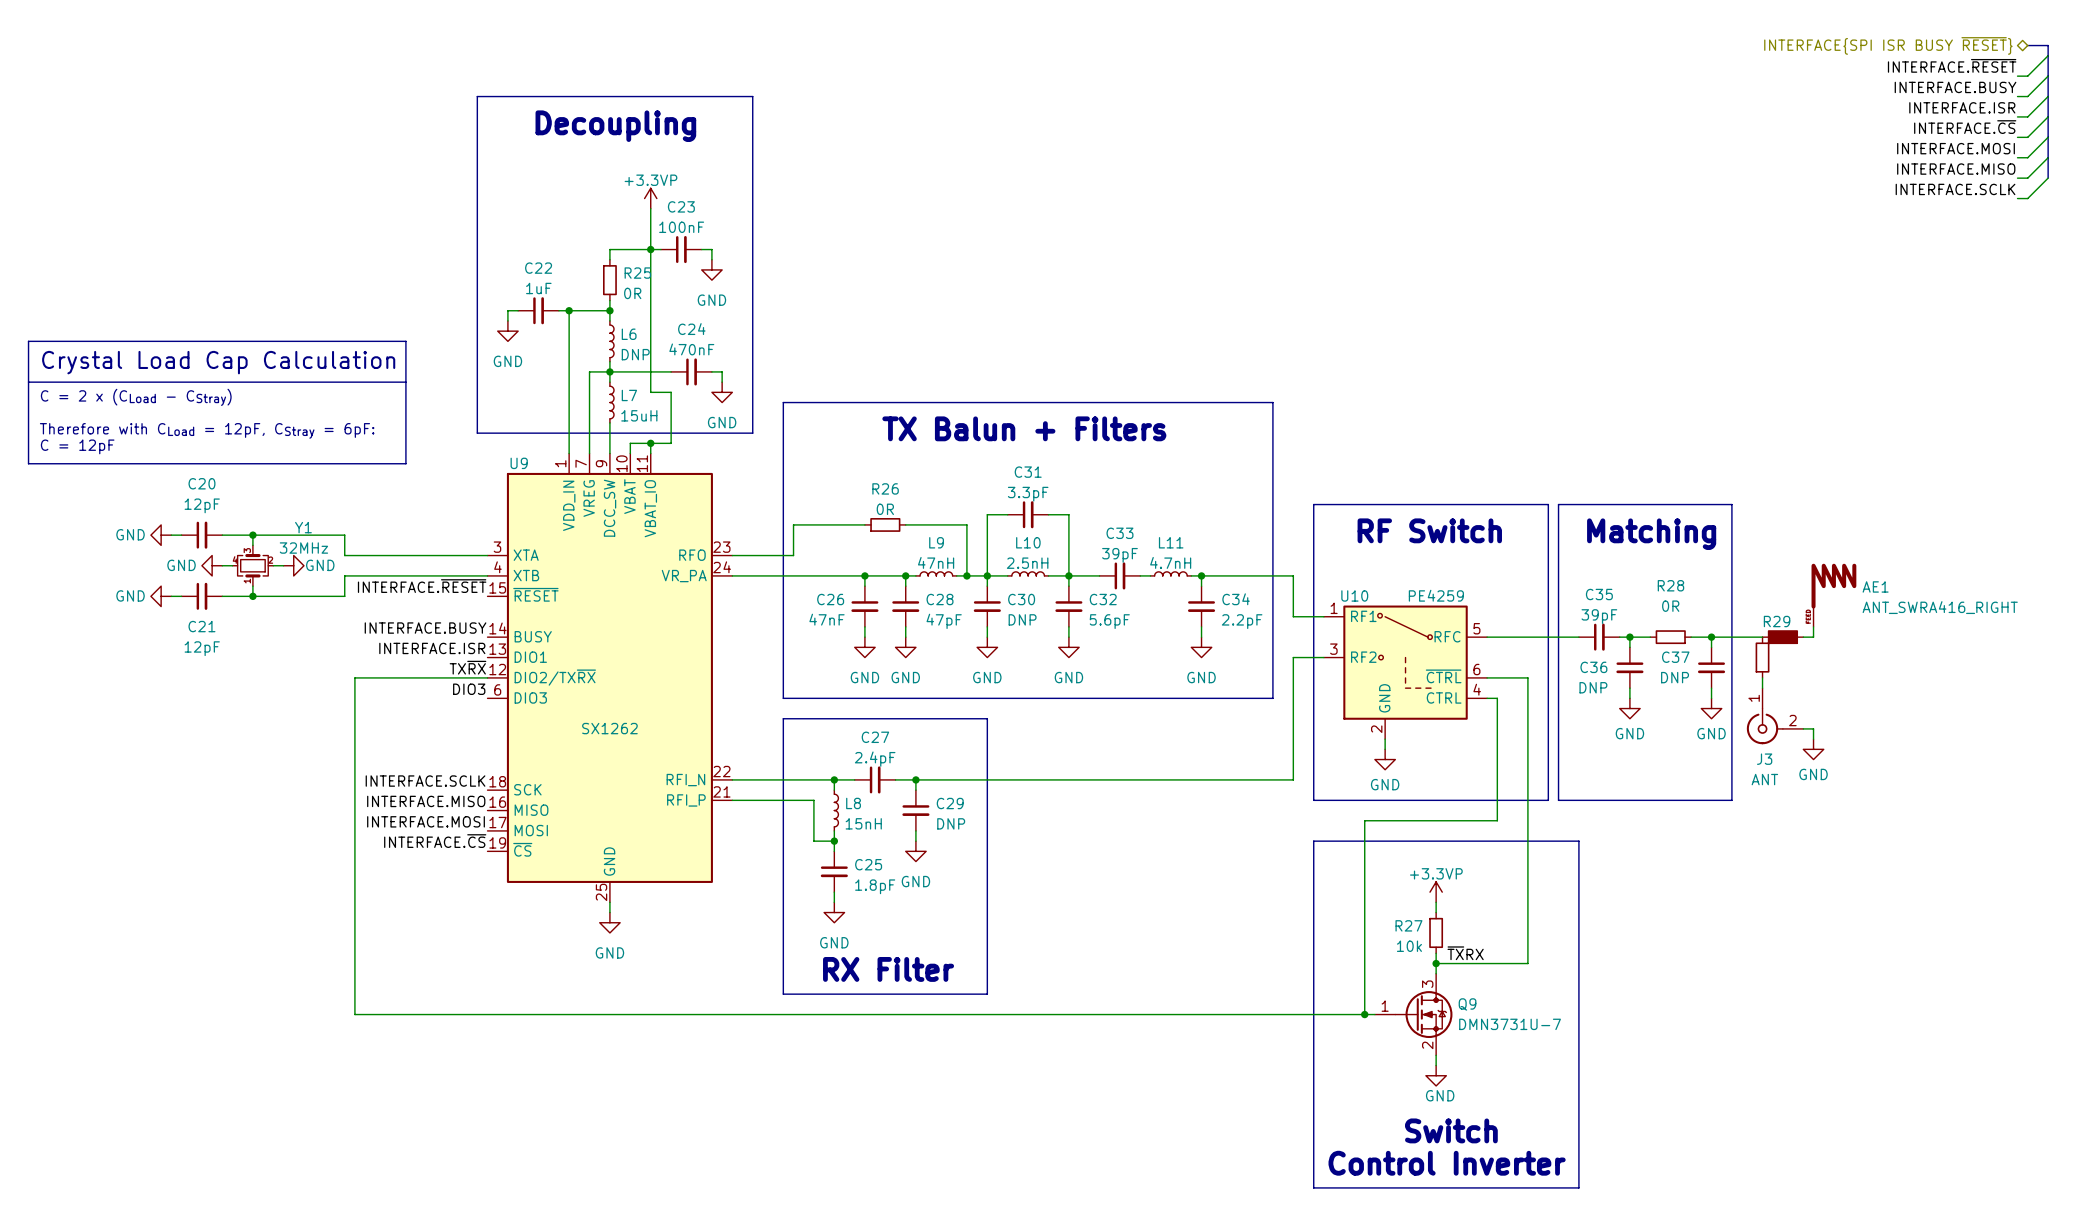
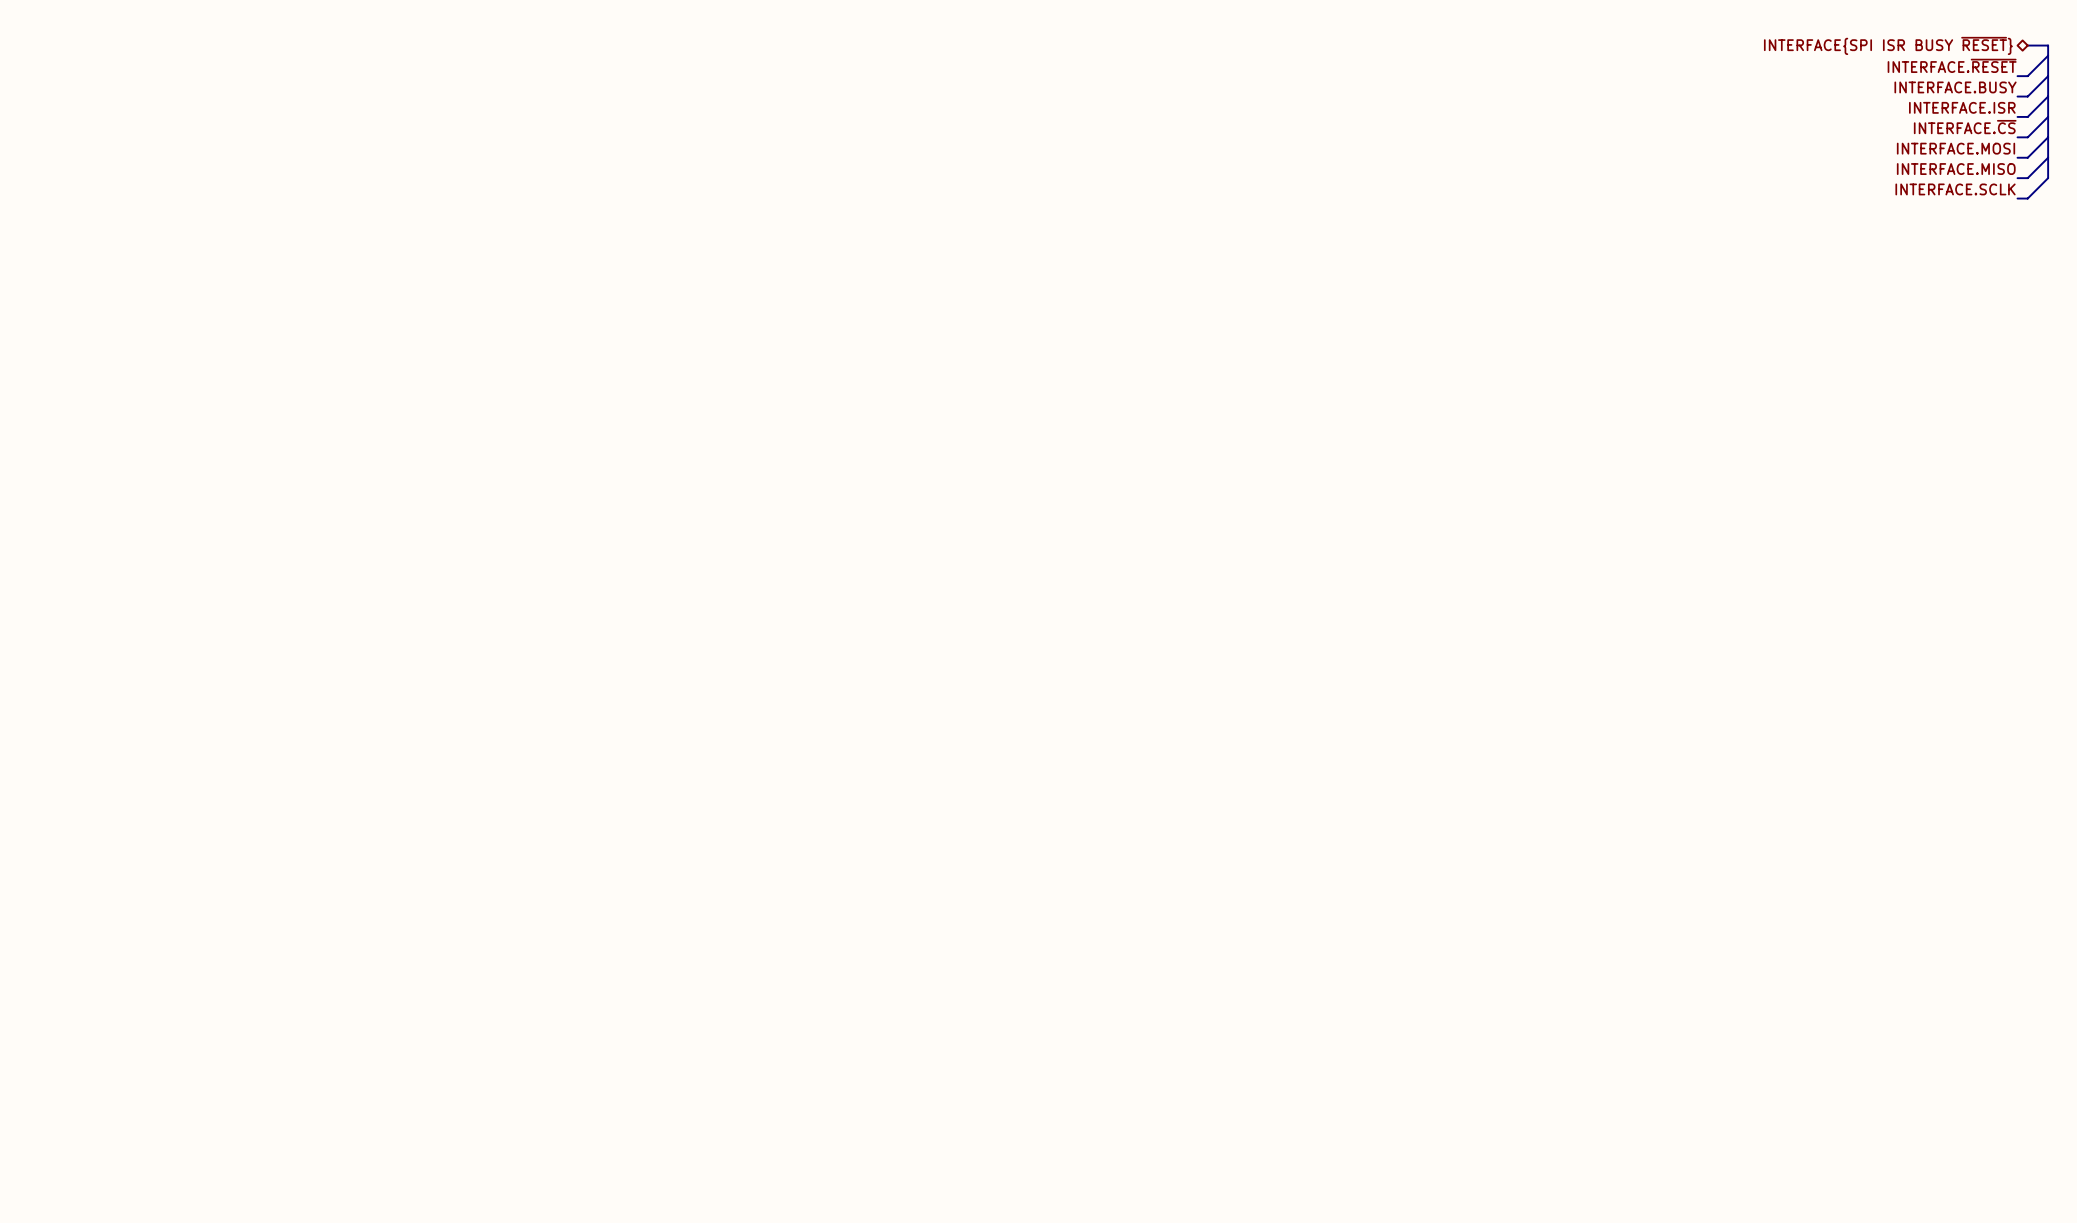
line: (477, 96) (477, 433) (752, 433) (752, 96) (477, 96) -> none
text: Decoupling (615, 126) -> none
power symbol: +3.3VP (650, 198) -> none
wire: (650, 208) (650, 392) (671, 392) (671, 443) (630, 443) (630, 453) -> none
junction: (650, 249) -> none
wire: (660, 249) (609, 249) (609, 259) -> none
C23: 100nF (681, 249) -> none
wire: (701, 249) (711, 249) (711, 259) -> none
power symbol: GND (711, 269) -> none
R25: 0R (609, 280) -> none
wire: (609, 300) (609, 320) -> none
wire: (518, 310) (507, 310) (507, 320) -> none
C22: 1uF (538, 310) -> none
wire: (558, 310) (609, 310) -> none
wire: (569, 310) (569, 453) -> none
junction: (569, 310) -> none
junction: (609, 310) -> none
power symbol: GND (507, 331) -> none
line: (28, 341) (28, 463) (405, 463) (405, 341) (28, 341) -> none
L6: DNP (611, 341) -> none
wire: (609, 361) (609, 382) -> none
text: Crystal Load Cap Calculation (218, 362) -> none
junction: (609, 371) -> none
wire: (671, 371) (589, 371) (589, 453) -> none
C24: 470nF (691, 371) -> none
wire: (711, 371) (722, 371) (722, 382) -> none
line: (28, 382) (405, 382) -> none
power symbol: GND (722, 392) -> none
text: C = 2 x (CLoad - CStray) (136, 397) -> none
L7: 15uH (611, 402) -> none
line: (783, 402) (1272, 402) (1272, 698) (783, 698) (783, 402) -> none
wire: (609, 422) (609, 453) -> none
text: TX Balun + Filters (1024, 428) -> none
text: Therefore with CLoad = 12pF, CStray = 6pF: (207, 430) -> none
wire: (650, 443) (650, 453) -> none
junction: (650, 443) -> none
text: C = 12pF (77, 446) -> none
line: (1313, 504) (1313, 800) (1548, 800) (1548, 504) (1313, 504) -> none
line: (1558, 504) (1731, 504) (1731, 800) (1558, 800) (1558, 504) -> none
wire: (1007, 514) (987, 514) (987, 586) -> none
C31: 3.3pF (1028, 514) -> none
wire: (1048, 514) (1068, 514) (1068, 586) -> none
wire: (864, 524) (793, 524) (793, 555) (732, 555) -> none
R26: 0R (885, 524) -> none
wire: (905, 524) (966, 524) (966, 575) -> none
text: RF Switch (1429, 530) -> none
text: Matching (1651, 534) -> none
power symbol: GND (161, 535) -> none
wire: (171, 535) (181, 535) -> none
C20: 12pF (201, 535) -> none
wire: (222, 535) (344, 535) (344, 555) (487, 555) -> none
wire: (252, 535) (252, 545) -> none
junction: (252, 535) -> none
power symbol: GND (212, 565) -> none
wire: (222, 565) (232, 565) -> none
Y1: 32MHz (252, 565) -> none
wire: (273, 565) (283, 565) -> none
power symbol: GND (293, 565) -> none
L9: 47nH (936, 573) -> none
L10: 2.5nH (1028, 573) -> none
L11: 4.7nH (1170, 573) -> none
wire: (487, 575) (344, 575) (344, 596) (222, 596) -> none
wire: (732, 575) (915, 575) -> none
wire: (864, 575) (864, 586) -> none
junction: (864, 575) -> none
wire: (905, 575) (905, 586) -> none
junction: (905, 575) -> none
wire: (956, 575) (1007, 575) -> none
junction: (966, 575) -> none
junction: (987, 575) -> none
wire: (1048, 575) (1099, 575) -> none
junction: (1068, 575) -> none
C33: 39pF (1119, 575) -> none
wire: (1140, 575) (1150, 575) -> none
wire: (1191, 575) (1293, 575) (1293, 616) (1323, 616) -> none
wire: (1201, 575) (1201, 586) -> none
junction: (1201, 575) -> none
wire: (252, 586) (252, 596) -> none
label: INTERFACE.~{RESET} (422, 586) -> none
AE1: ANT_SWRA416_RIGHT (1833, 595) -> none
power symbol: GND (161, 596) -> none
wire: (171, 596) (181, 596) -> none
C21: 12pF (201, 596) -> none
junction: (252, 596) -> none
C26: 47nF (864, 606) -> none
C28: 47pF (905, 606) -> none
C30: DNP (987, 606) -> none
C32: 5.6pF (1068, 606) -> none
C34: 2.2pF (1201, 606) -> none
wire: (864, 626) (864, 637) -> none
wire: (905, 626) (905, 637) -> none
wire: (987, 626) (987, 637) -> none
wire: (1068, 626) (1068, 637) -> none
wire: (1201, 626) (1201, 637) -> none
wire: (1813, 626) (1813, 637) (1803, 637) -> none
label: INTERFACE.BUSY (425, 628) -> none
wire: (1487, 637) (1578, 637) -> none
C35: 39pF (1599, 637) -> none
wire: (1619, 637) (1650, 637) -> none
wire: (1629, 637) (1629, 647) -> none
junction: (1629, 637) -> none
R28: 0R (1670, 637) -> none
wire: (1691, 637) (1762, 637) -> none
wire: (1711, 637) (1711, 647) -> none
junction: (1711, 637) -> none
power symbol: GND (864, 647) -> none
power symbol: GND (905, 647) -> none
power symbol: GND (987, 647) -> none
power symbol: GND (1068, 647) -> none
power symbol: GND (1201, 647) -> none
label: INTERFACE.ISR (432, 648) -> none
R29: (1779, 654) -> none
wire: (1323, 657) (1293, 657) (1293, 779) (895, 779) -> none
label: TX~{RX} (468, 667) -> none
C36: DNP (1629, 667) -> none
C37: DNP (1711, 667) -> none
U10: PE4259 (1405, 672) -> none
wire: (487, 677) (354, 677) (354, 1014) (1374, 1014) -> none
U9: SX1262 (609, 677) -> none
wire: (1487, 677) (1527, 677) (1527, 963) (1436, 963) -> none
wire: (1762, 677) (1762, 688) -> none
wire: (1629, 688) (1629, 698) -> none
wire: (1711, 688) (1711, 698) -> none
label: DIO3 (469, 689) -> none
wire: (1487, 698) (1497, 698) (1497, 820) (1364, 820) (1364, 1014) -> none
power symbol: GND (1629, 708) -> none
power symbol: GND (1711, 708) -> none
J3: ANT (1775, 716) -> none
line: (783, 718) (783, 994) (987, 994) (987, 718) (783, 718) -> none
wire: (1803, 728) (1813, 728) (1813, 739) -> none
wire: (1385, 739) (1385, 749) -> none
power symbol: GND (1813, 749) -> none
power symbol: GND (1385, 759) -> none
wire: (732, 779) (854, 779) -> none
wire: (834, 779) (834, 790) -> none
junction: (834, 779) -> none
C27: 2.4pF (875, 779) -> none
wire: (915, 779) (915, 790) -> none
junction: (915, 779) -> none
label: INTERFACE.SCLK (425, 781) -> none
wire: (732, 800) (813, 800) (813, 841) (834, 841) -> none
label: INTERFACE.MISO (426, 801) -> none
L8: 15nH (836, 810) -> none
C29: DNP (915, 810) -> none
label: INTERFACE.MOSI (426, 821) -> none
wire: (834, 830) (834, 851) -> none
wire: (915, 830) (915, 841) -> none
label: INTERFACE.~{CS} (435, 841) -> none
junction: (834, 841) -> none
line: (1313, 841) (1313, 1187) (1578, 1187) (1578, 841) (1313, 841) -> none
power symbol: GND (915, 851) -> none
C25: 1.8pF (834, 871) -> none
wire: (834, 892) (834, 902) -> none
power symbol: +3.3VP (1436, 892) -> none
wire: (609, 902) (609, 912) -> none
wire: (1436, 902) (1436, 912) -> none
power symbol: GND (834, 912) -> none
power symbol: GND (609, 922) -> none
R27: 10k (1436, 932) -> none
wire: (1436, 953) (1436, 973) -> none
label: ~{TX}RX (1465, 953) -> none
junction: (1436, 963) -> none
text: RX Filter (888, 969) -> none
junction: (1364, 1014) -> none
Q9: DMN3731U-7 (1413, 1014) -> none
wire: (1436, 1055) (1436, 1065) -> none
power symbol: GND (1436, 1075) -> none
text: Switch (1451, 1130) -> none
text: Control Inverter (1447, 1163) -> none

